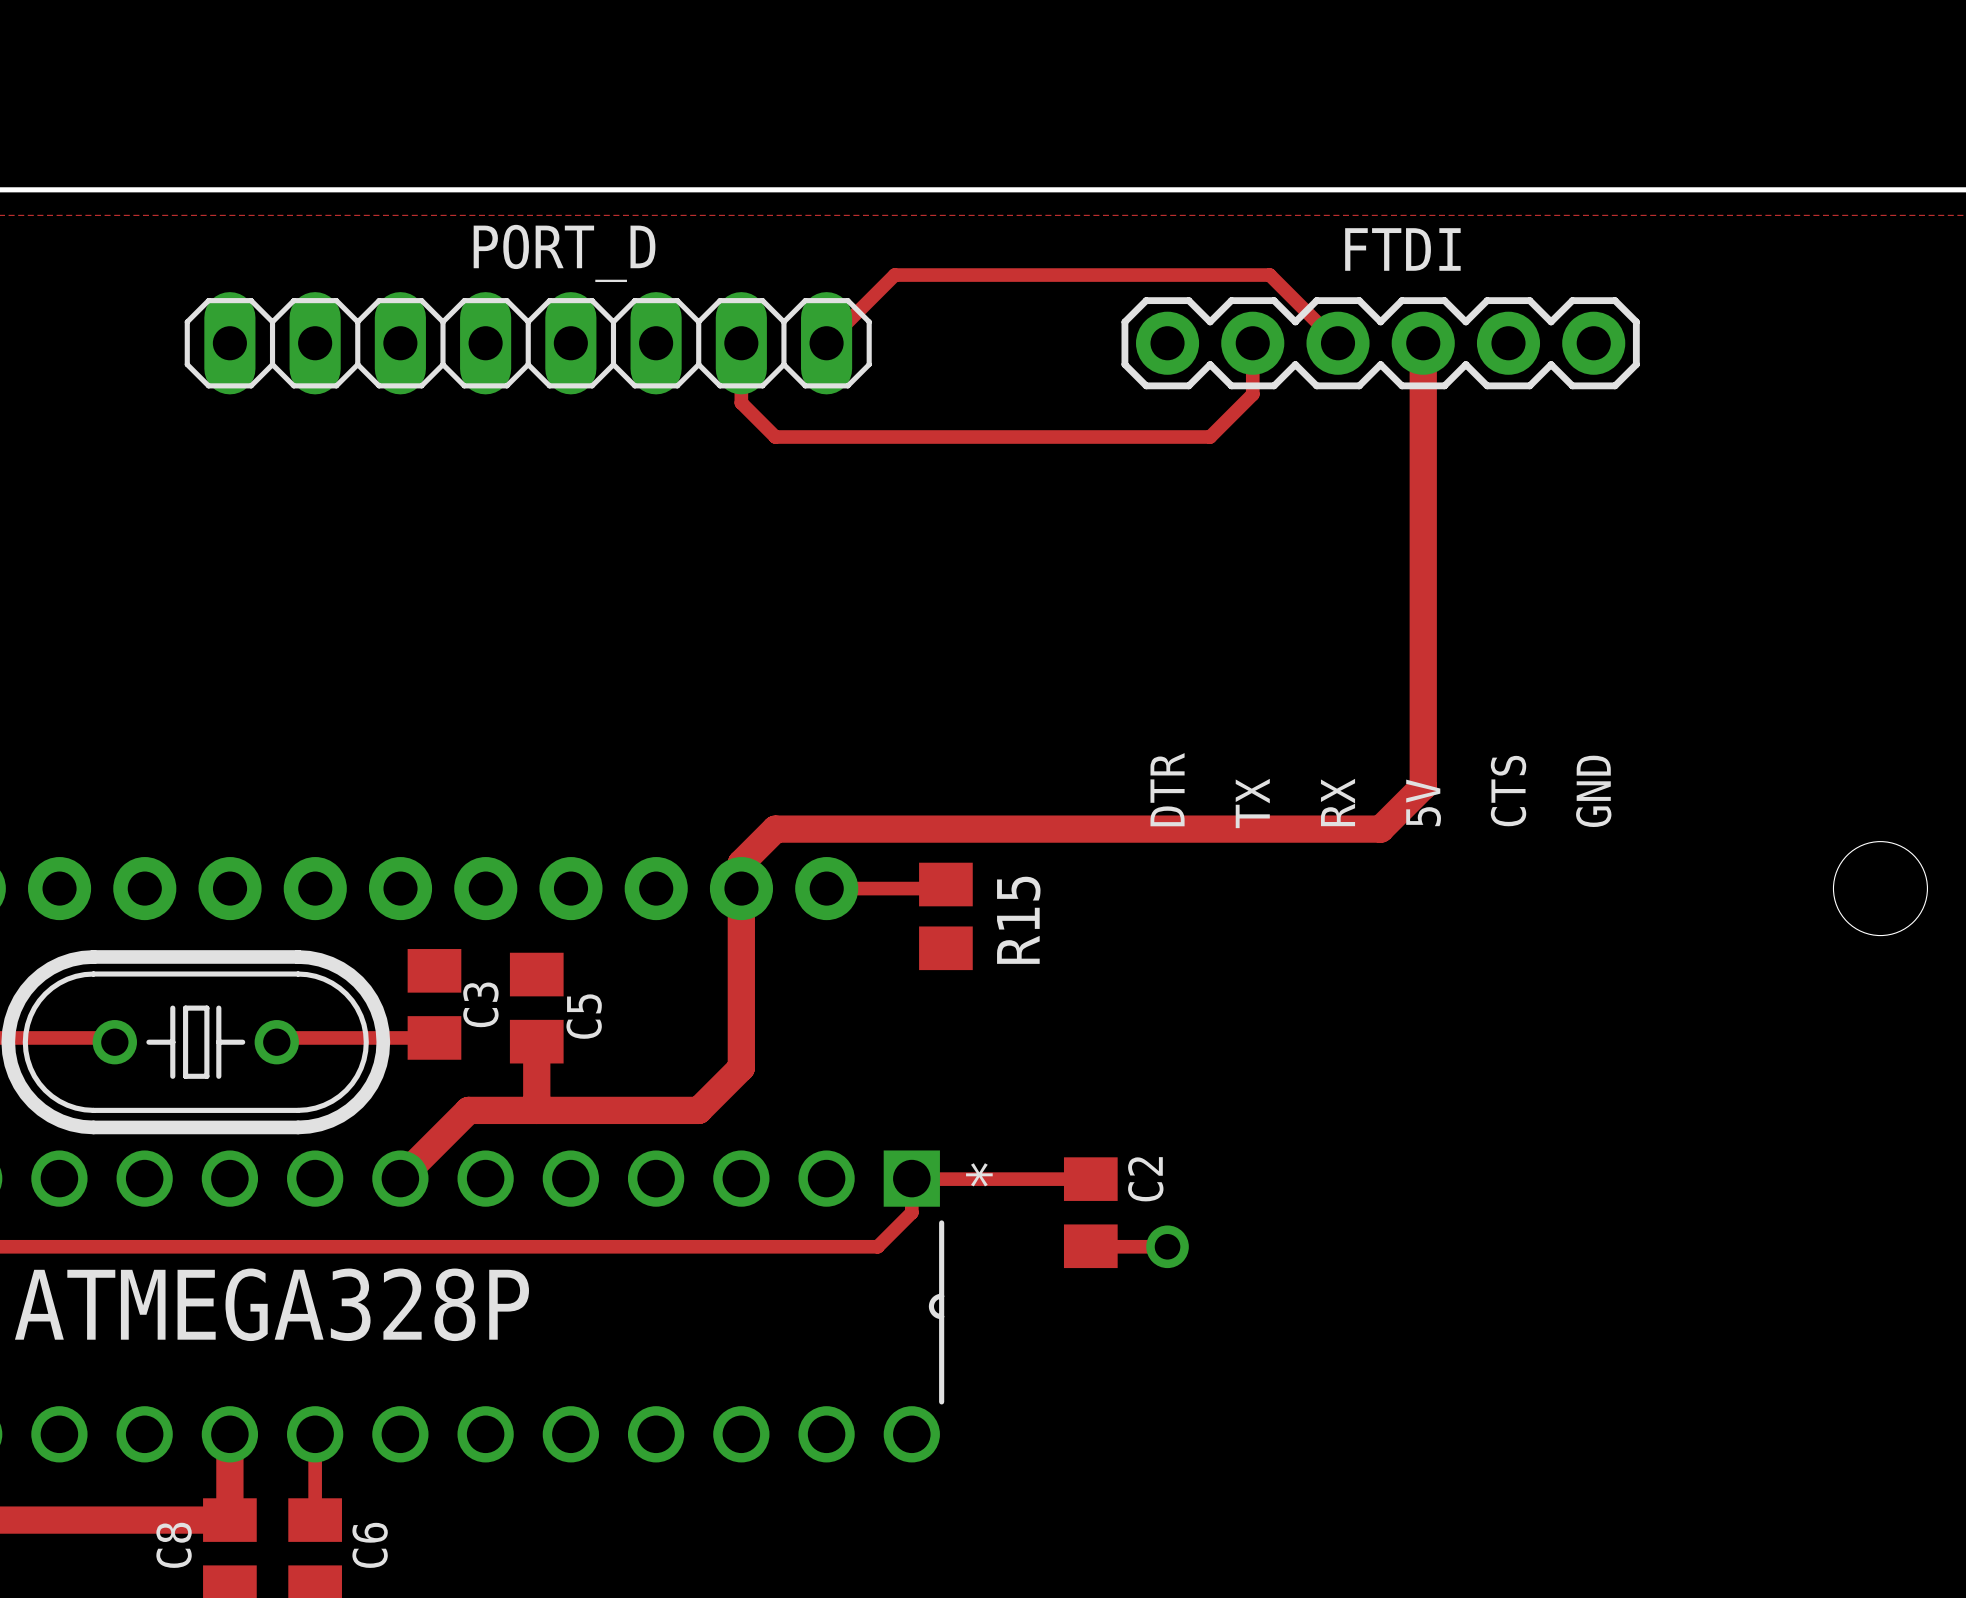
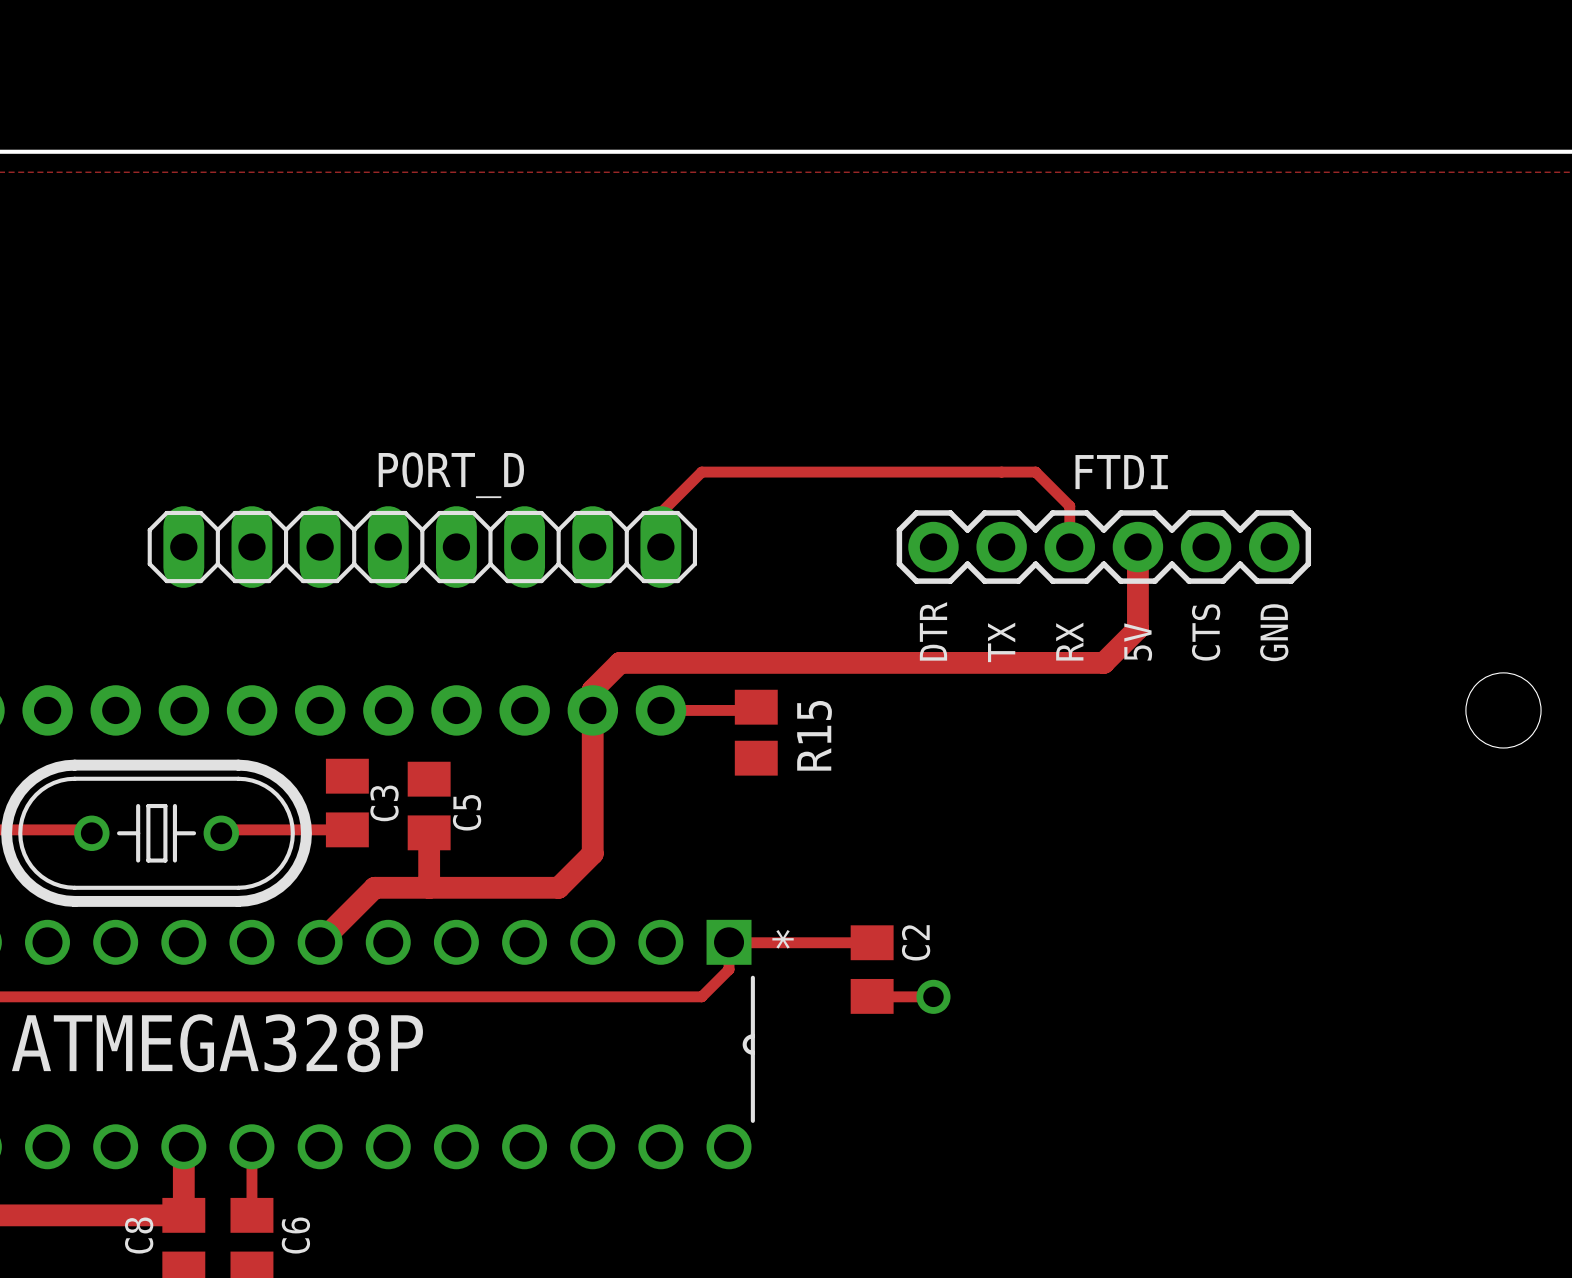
PORT_D position: (528, 343) -> (422, 547)
track: (741, 343) (741, 402) (775, 437) (1210, 437) (1252, 394) (1252, 343) -> none
track: (826, 343) (894, 275) (1269, 275) (1338, 343) -> none
FTDI position: (1380, 343) -> (1103, 547)
track: (1423, 343) (1423, 684) -> none
track: none -> (660, 547) (660, 512) (701, 472) (1035, 472) (1069, 506) (1069, 547)

